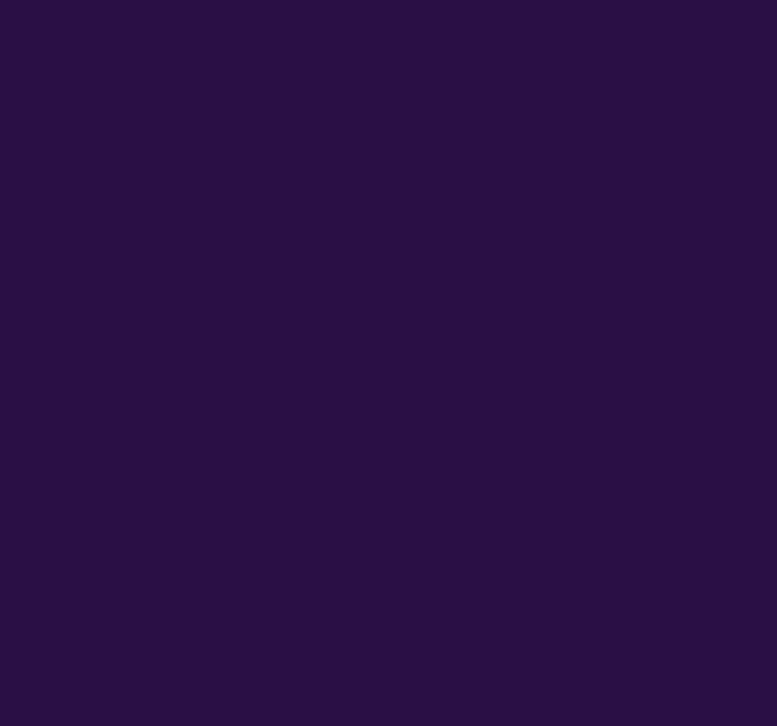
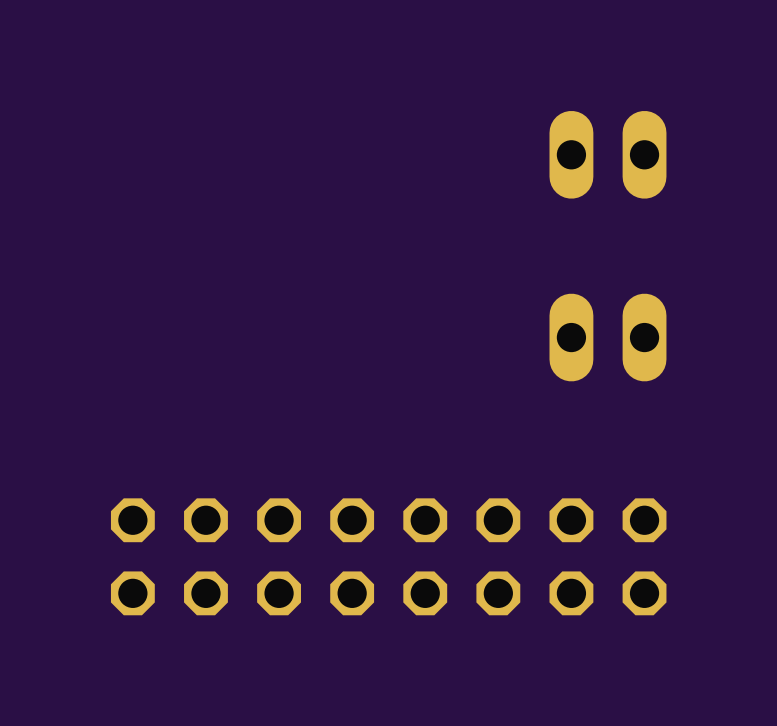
part: none -> (607, 154)
part: none -> (607, 337)
part: none -> (388, 556)

